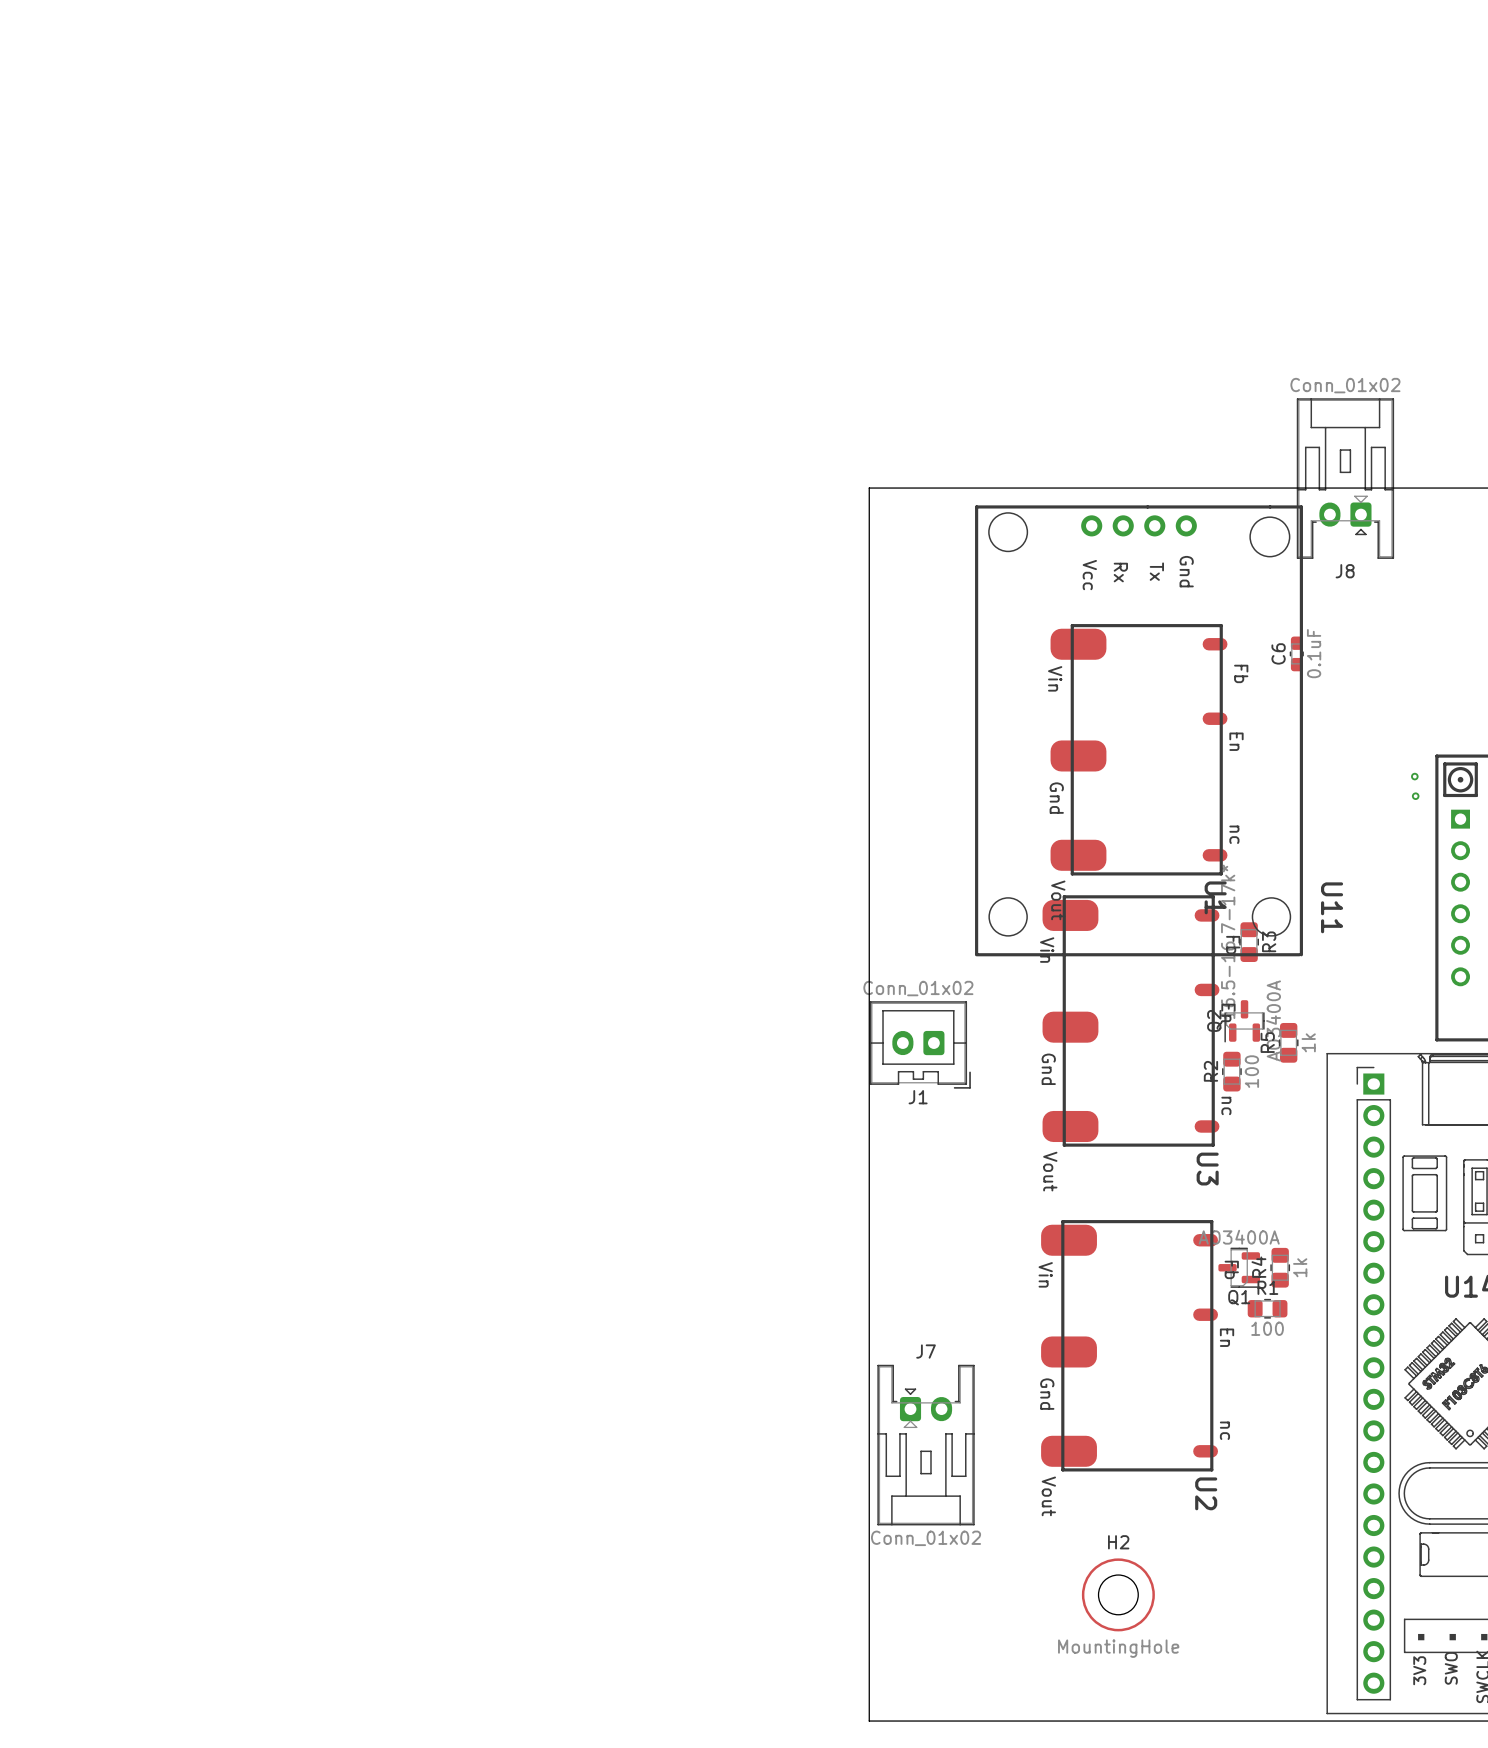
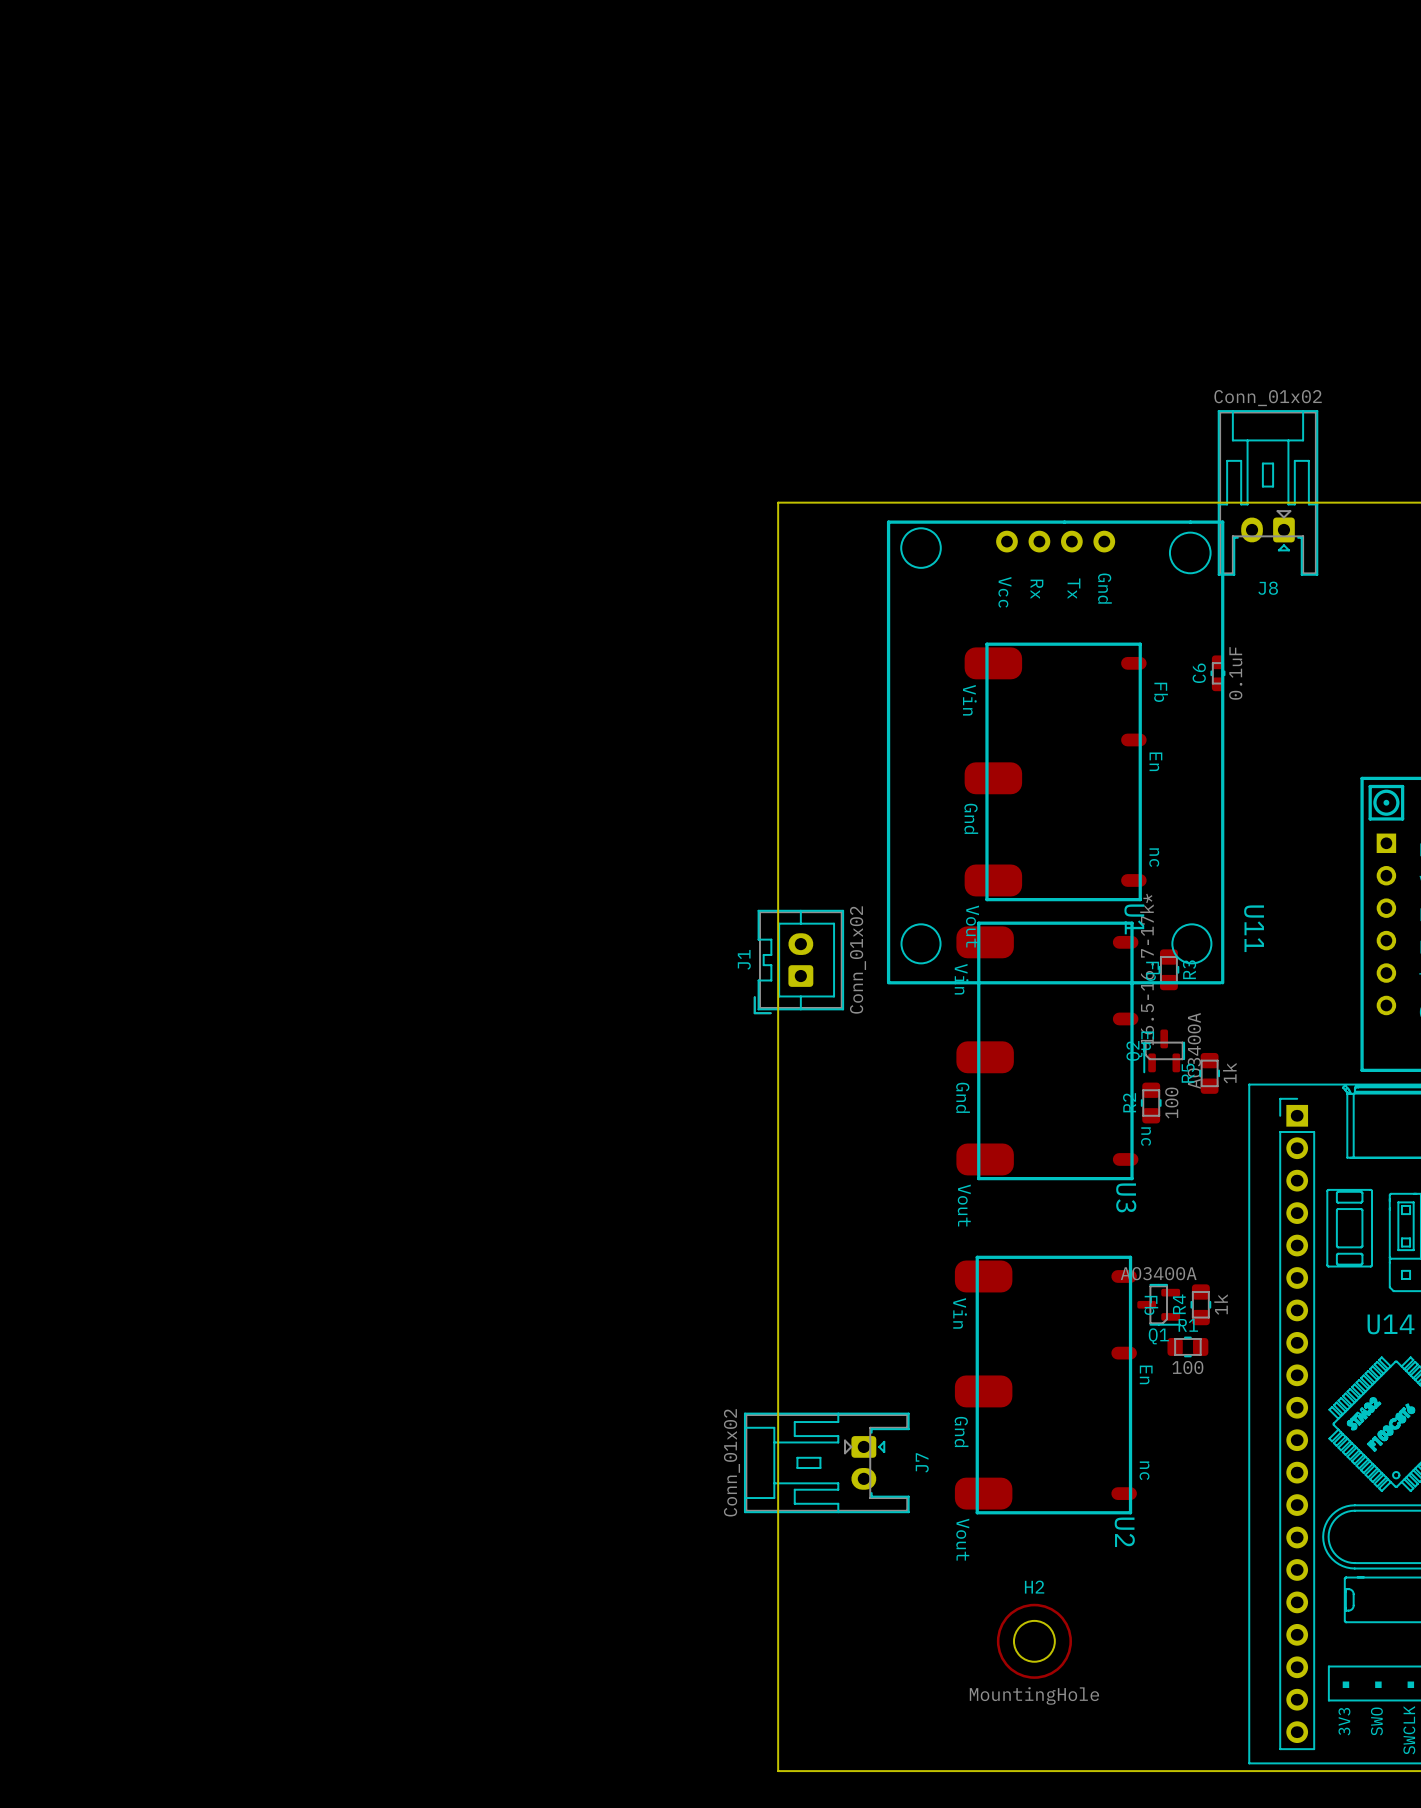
via: (1414, 776) -> none
via: (1415, 796) -> none
J1 rotation: 0° (920, 1044) -> 90° clockwise (798, 961)
J1 position: (920, 1044) -> (798, 961)
J7 rotation: 0° (926, 1445) -> 90° clockwise (826, 1462)

